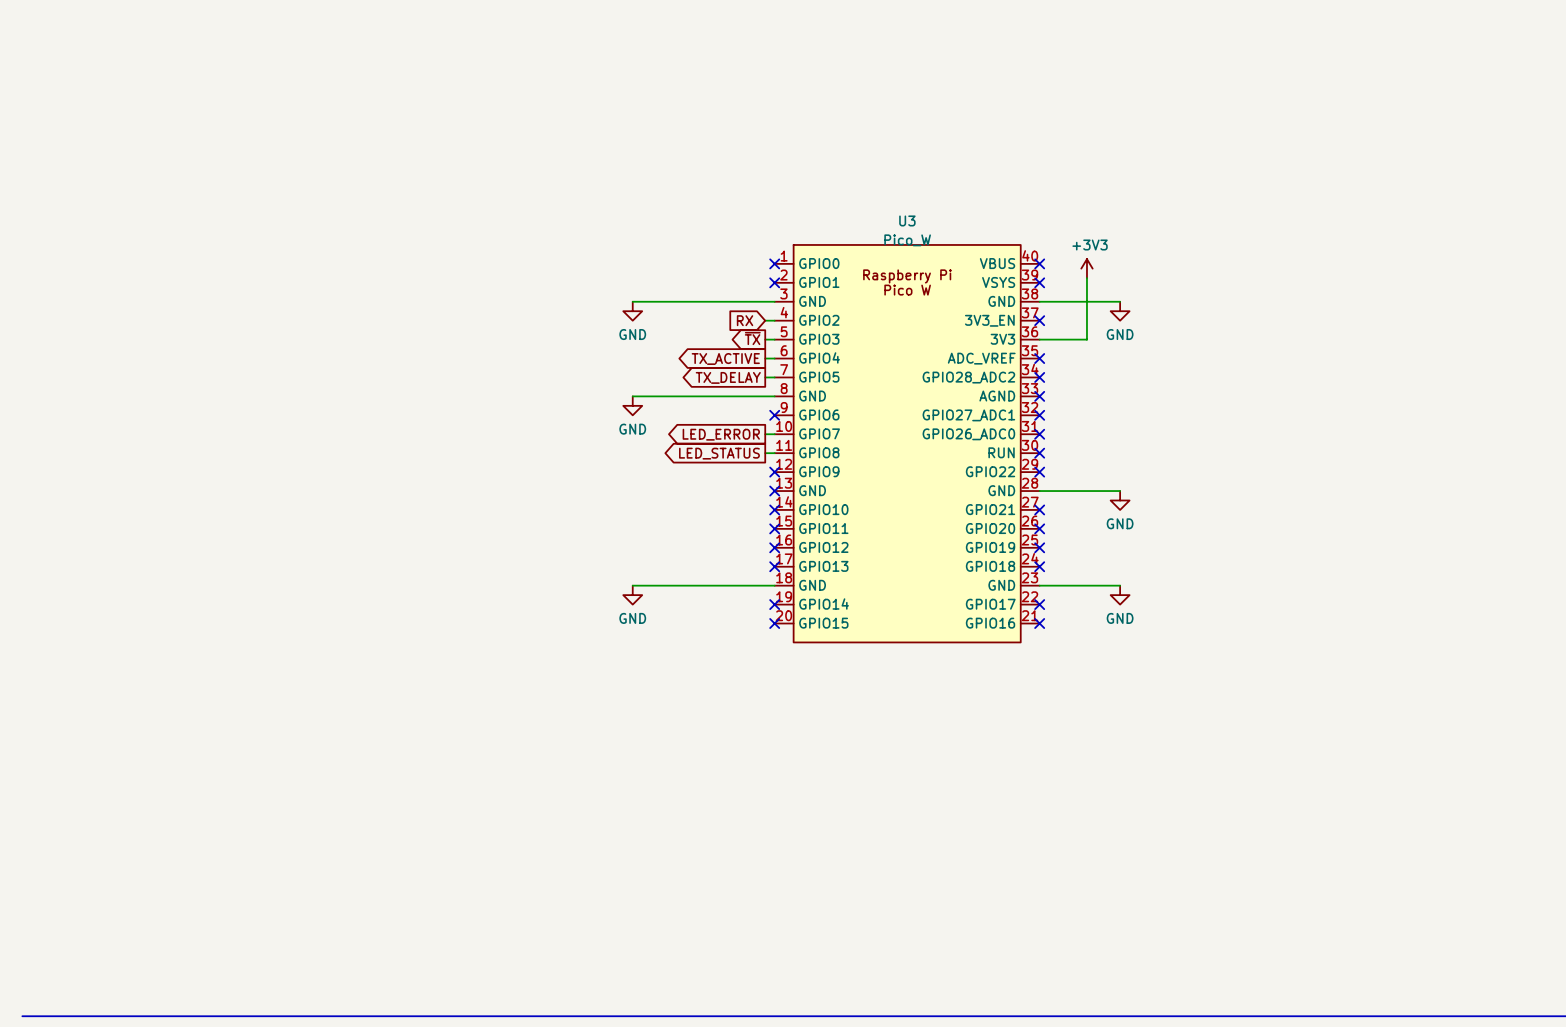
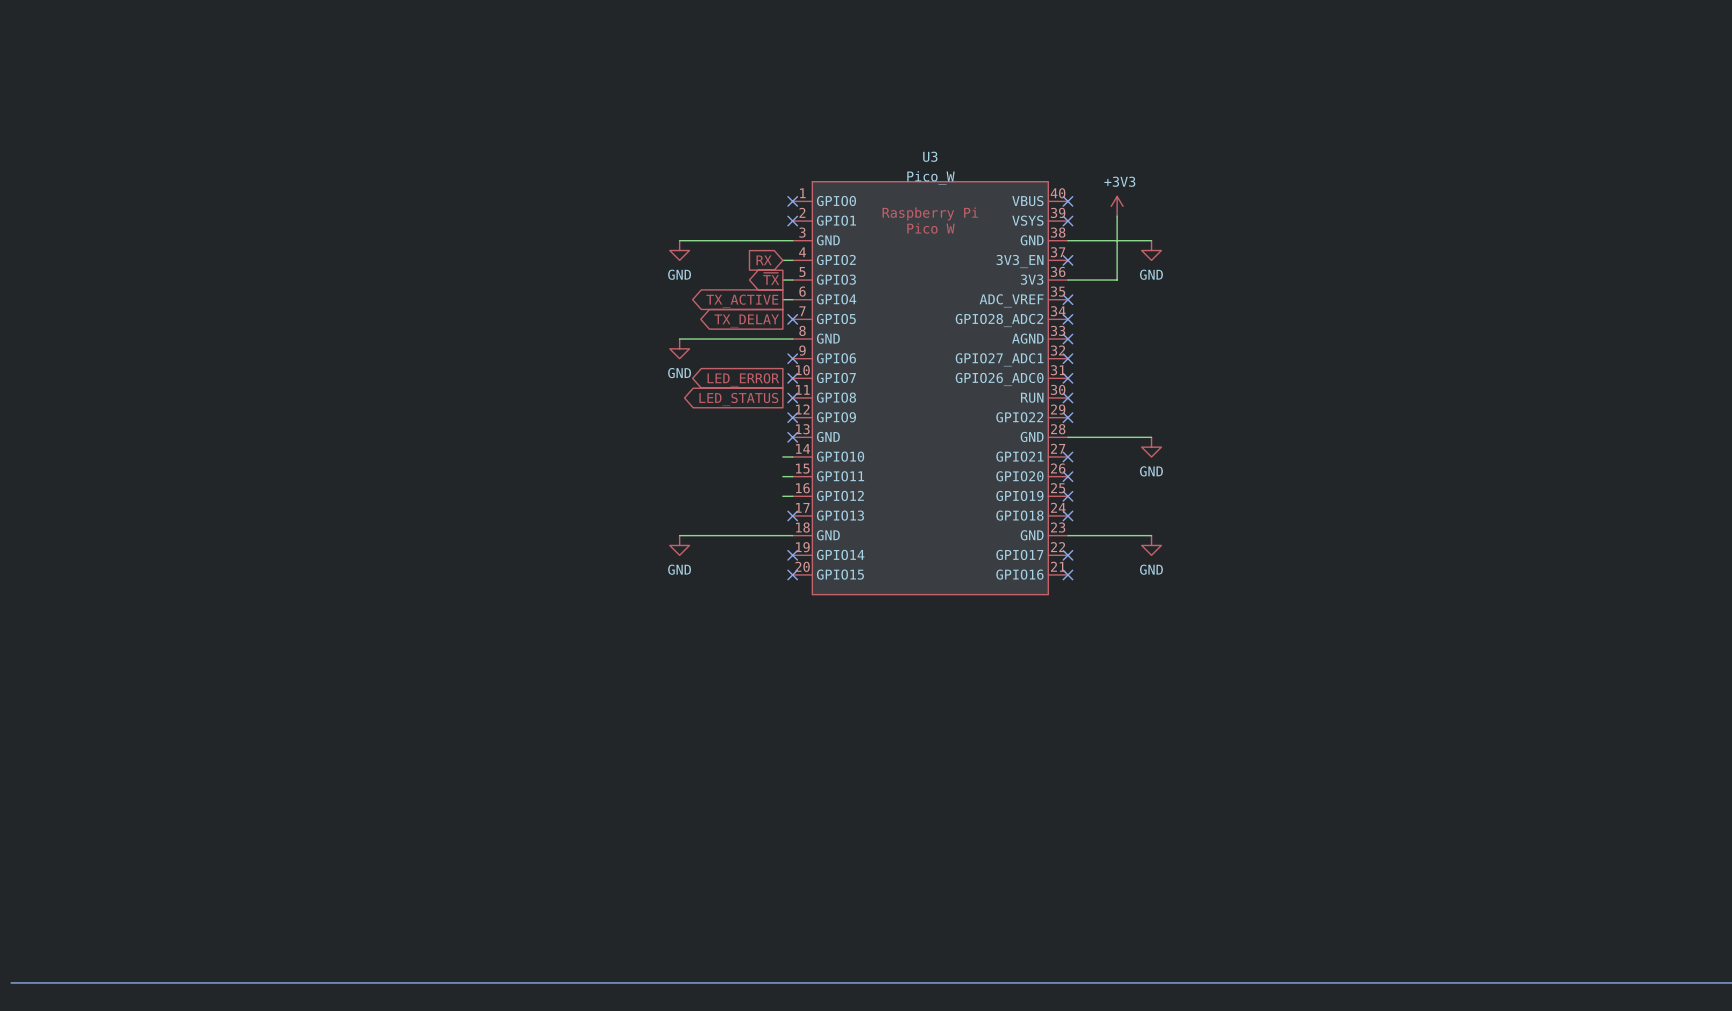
wire: (632, 301) (665, 301) -> none
power symbol position: GND (632, 311) -> GND (679, 250)
wire: (765, 377) (774, 377) -> (782, 496) (792, 496)
no-connect mark: none -> (792, 319)
wire: (632, 396) (665, 396) -> none
power symbol position: GND (632, 405) -> GND (679, 348)
wire: (765, 434) (774, 434) -> (782, 456) (792, 456)
no-connect mark: none -> (792, 378)
wire: (765, 453) (774, 453) -> (782, 476) (792, 476)
no-connect mark: none -> (792, 398)
no-connect mark: (774, 509) -> none
no-connect mark: (774, 528) -> none
no-connect mark: (774, 547) -> none
wire: (632, 585) (665, 585) -> none
power symbol position: GND (632, 595) -> GND (679, 545)

